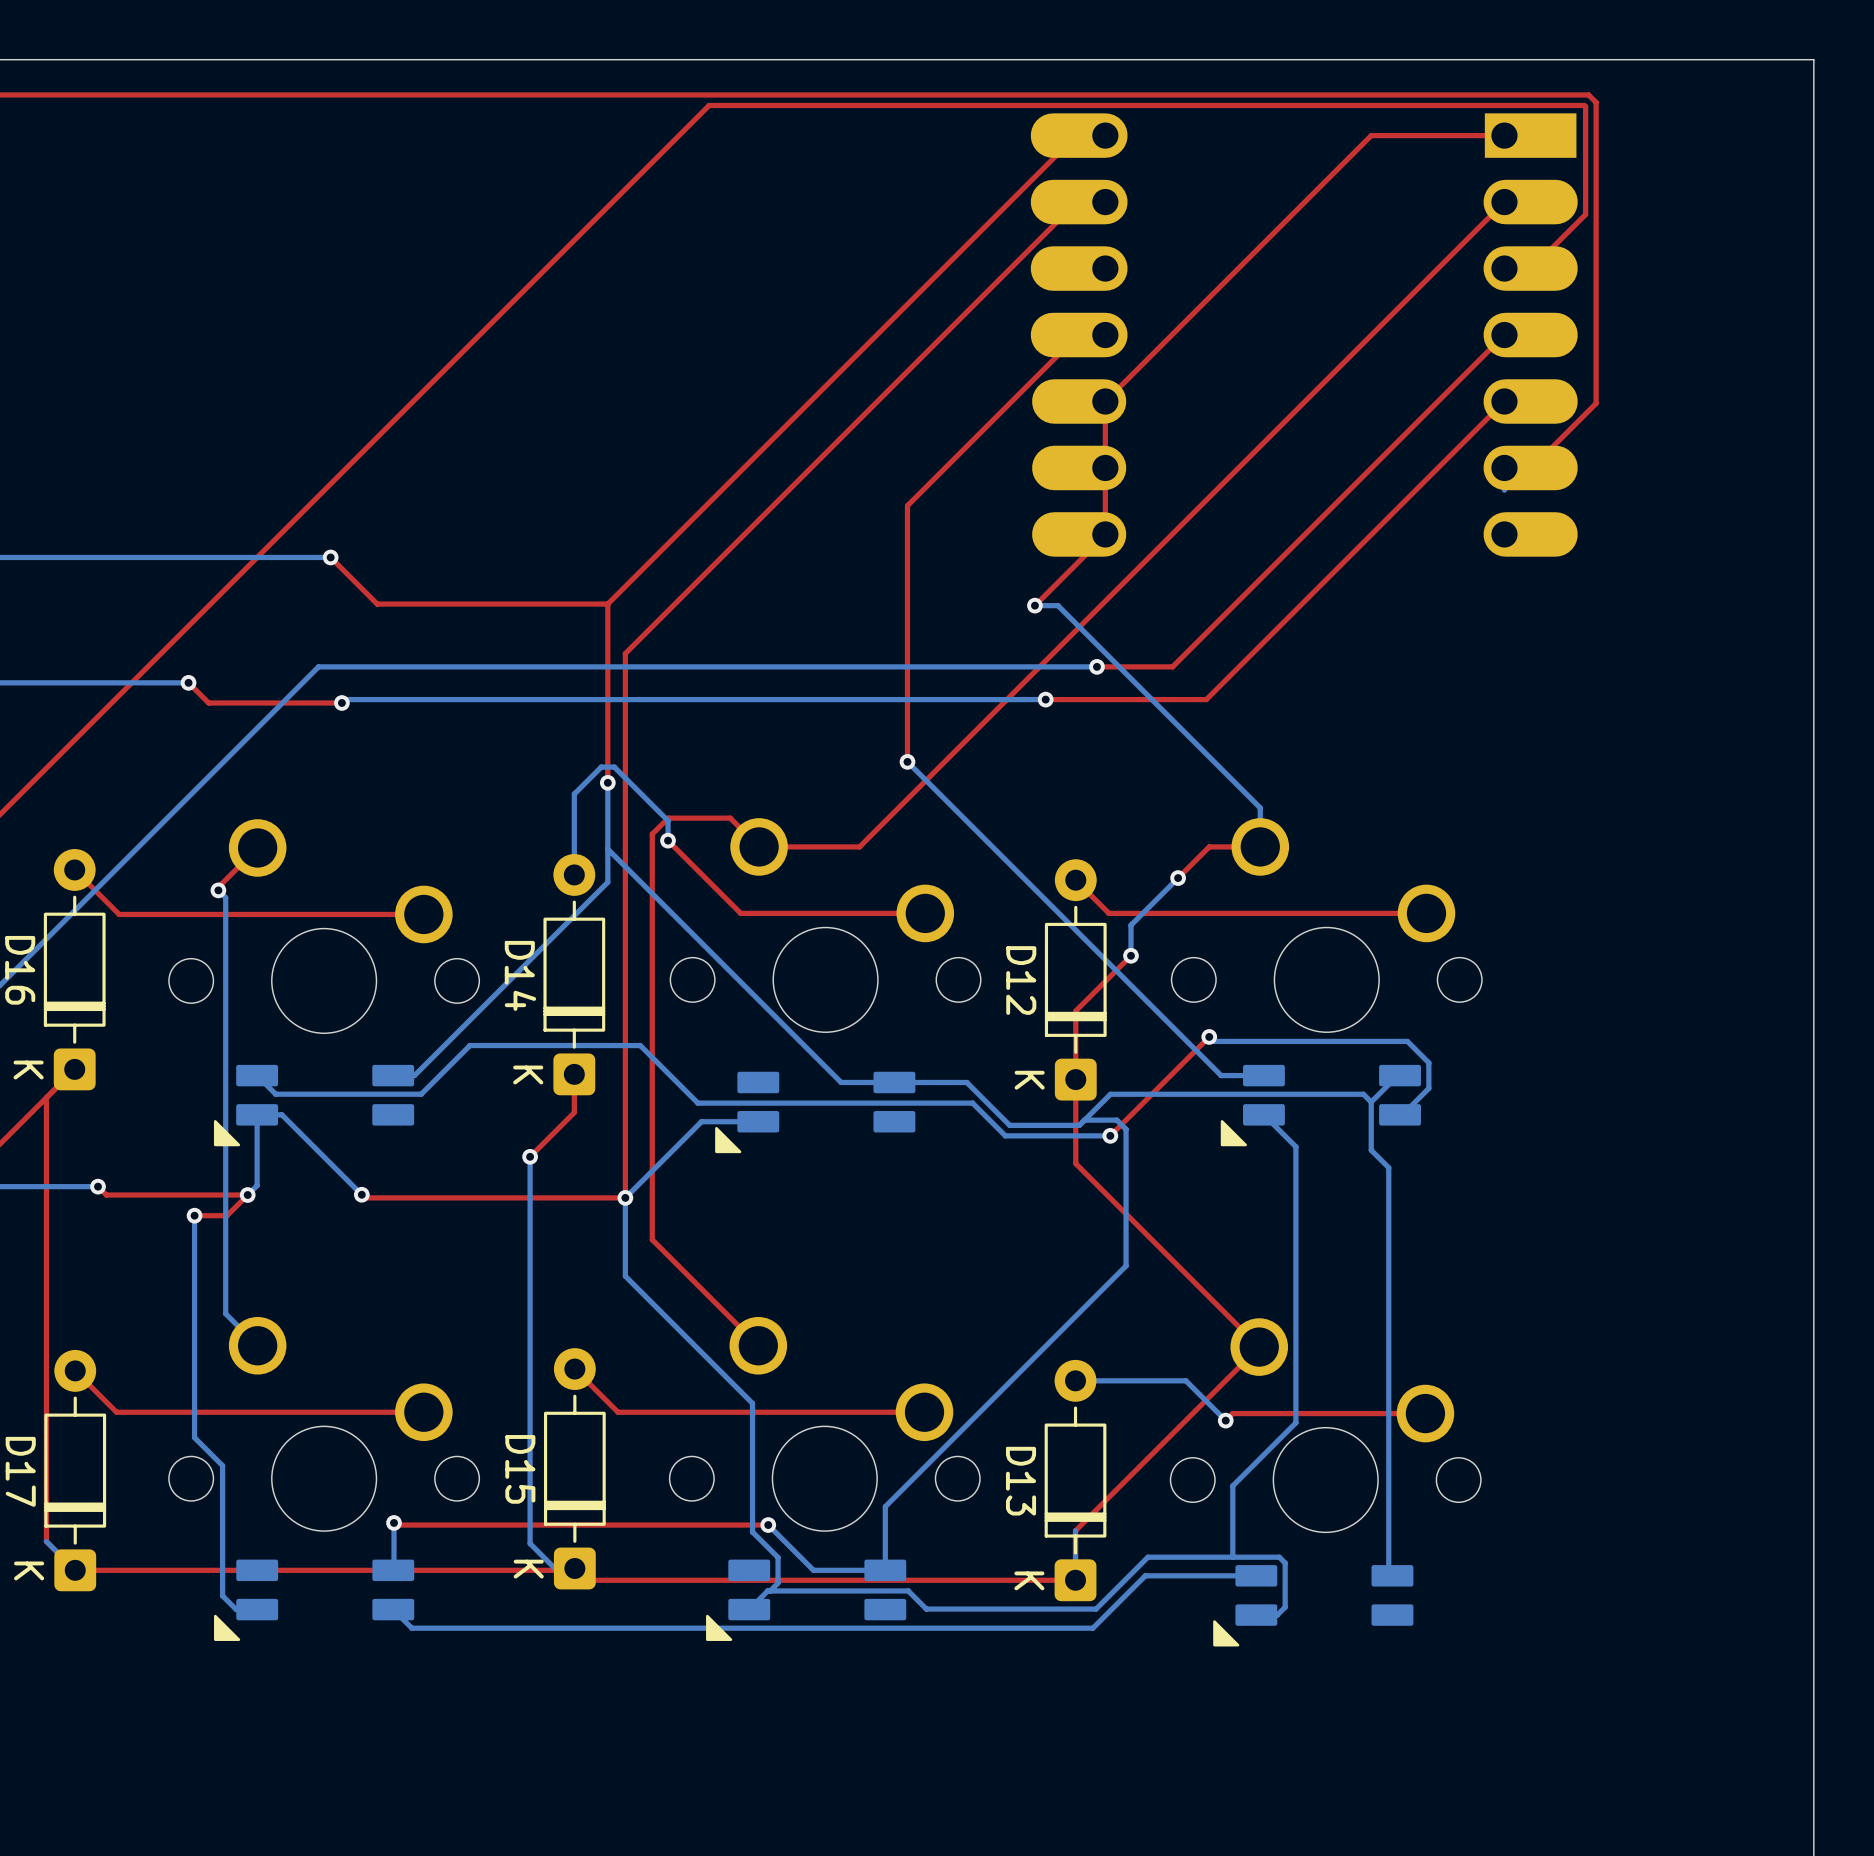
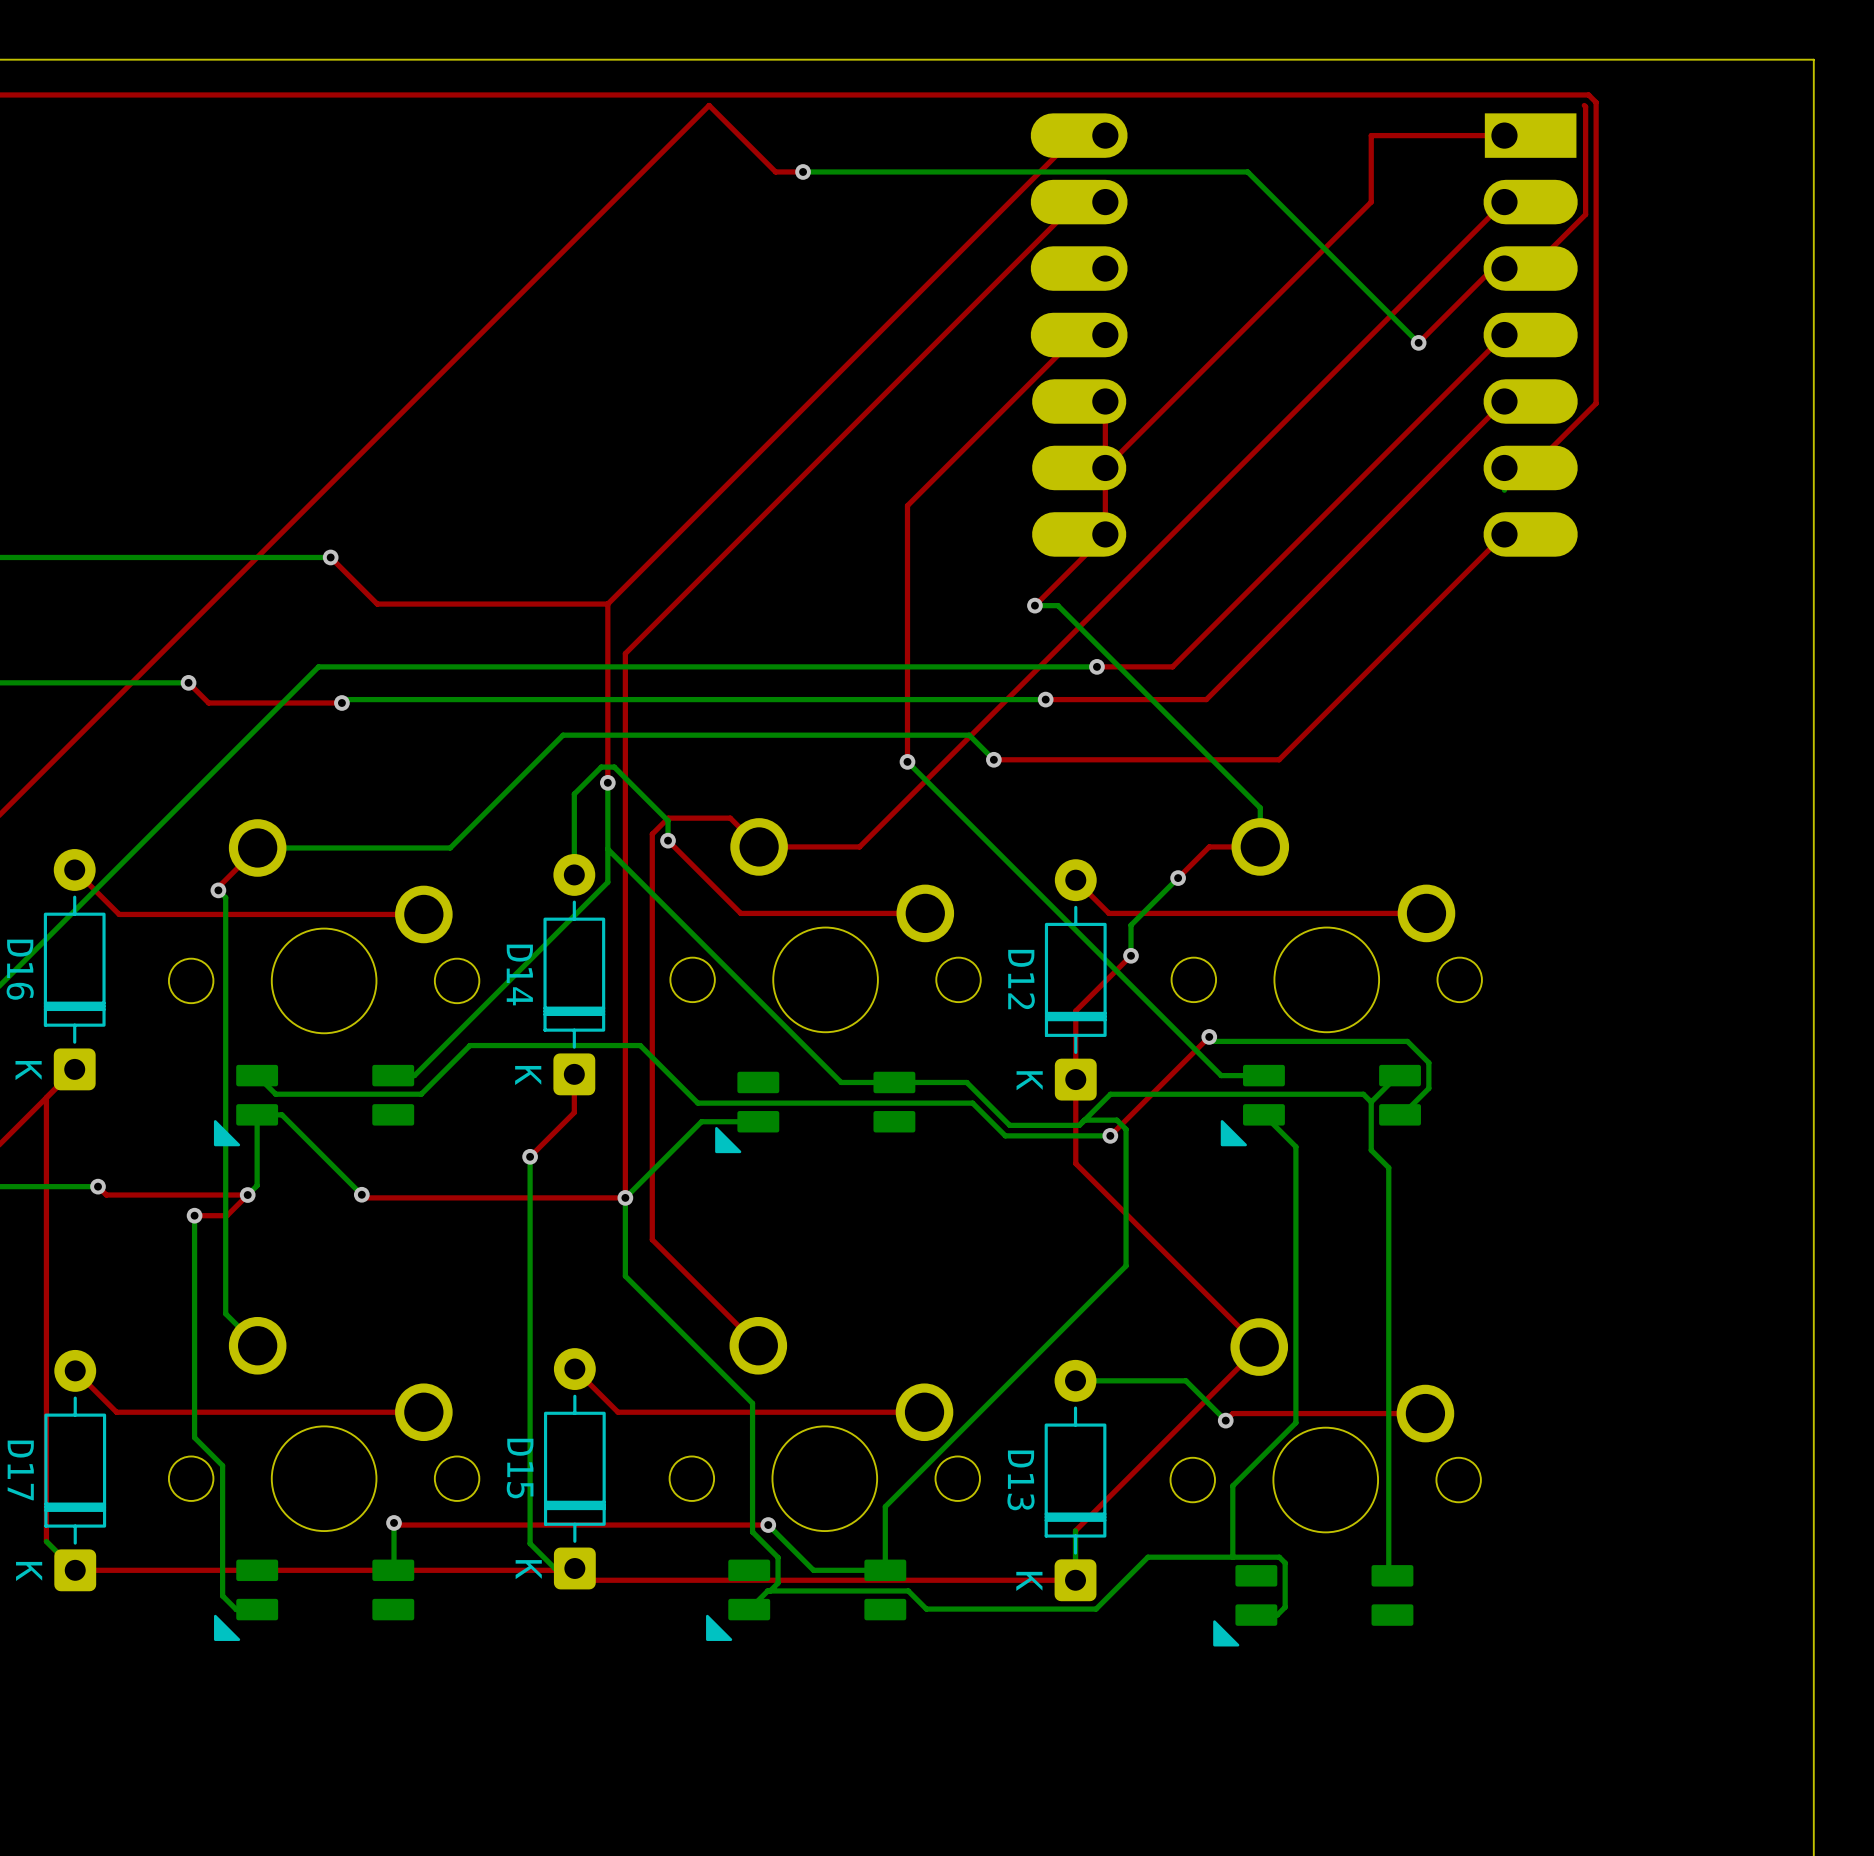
top track: (1584, 105) (709, 105) -> (803, 171) (775, 171) (709, 105)
top track: (1371, 135) (1105, 401) -> (1371, 135) (1371, 202) (1105, 467)
bottom track: none -> (803, 171) (1247, 171) (1418, 342)
via: none -> (803, 171)
top track: none -> (1504, 268) (1492, 268) (1418, 342)
via: none -> (1418, 342)
top track: none -> (1504, 534) (1279, 759) (993, 759)
bottom track: none -> (993, 759) (969, 735) (563, 735) (450, 847) (257, 847)
via: none -> (993, 759)
bottom track: (1256, 1575) (1145, 1575) (1092, 1628) (411, 1628) (393, 1609) -> none

